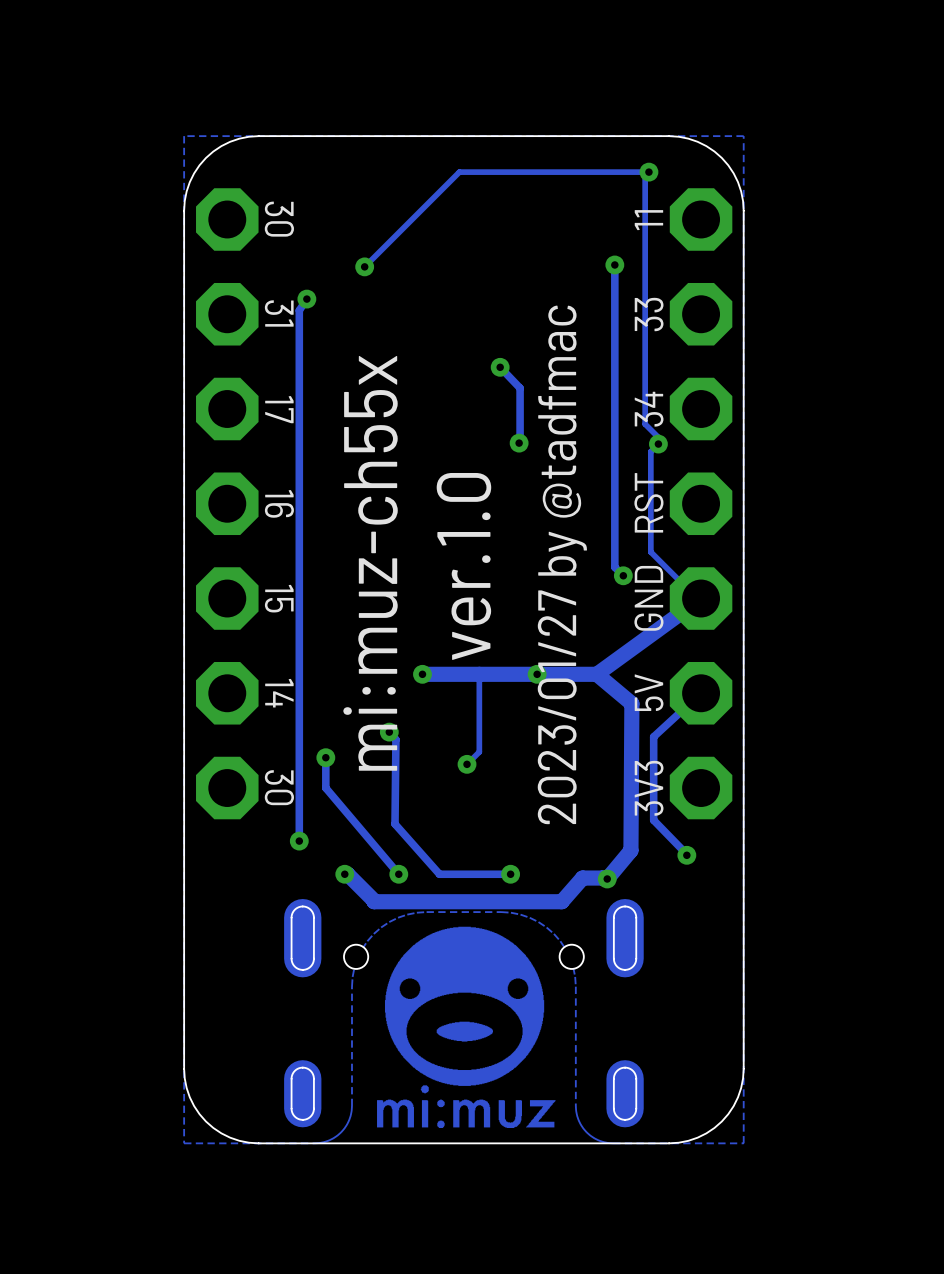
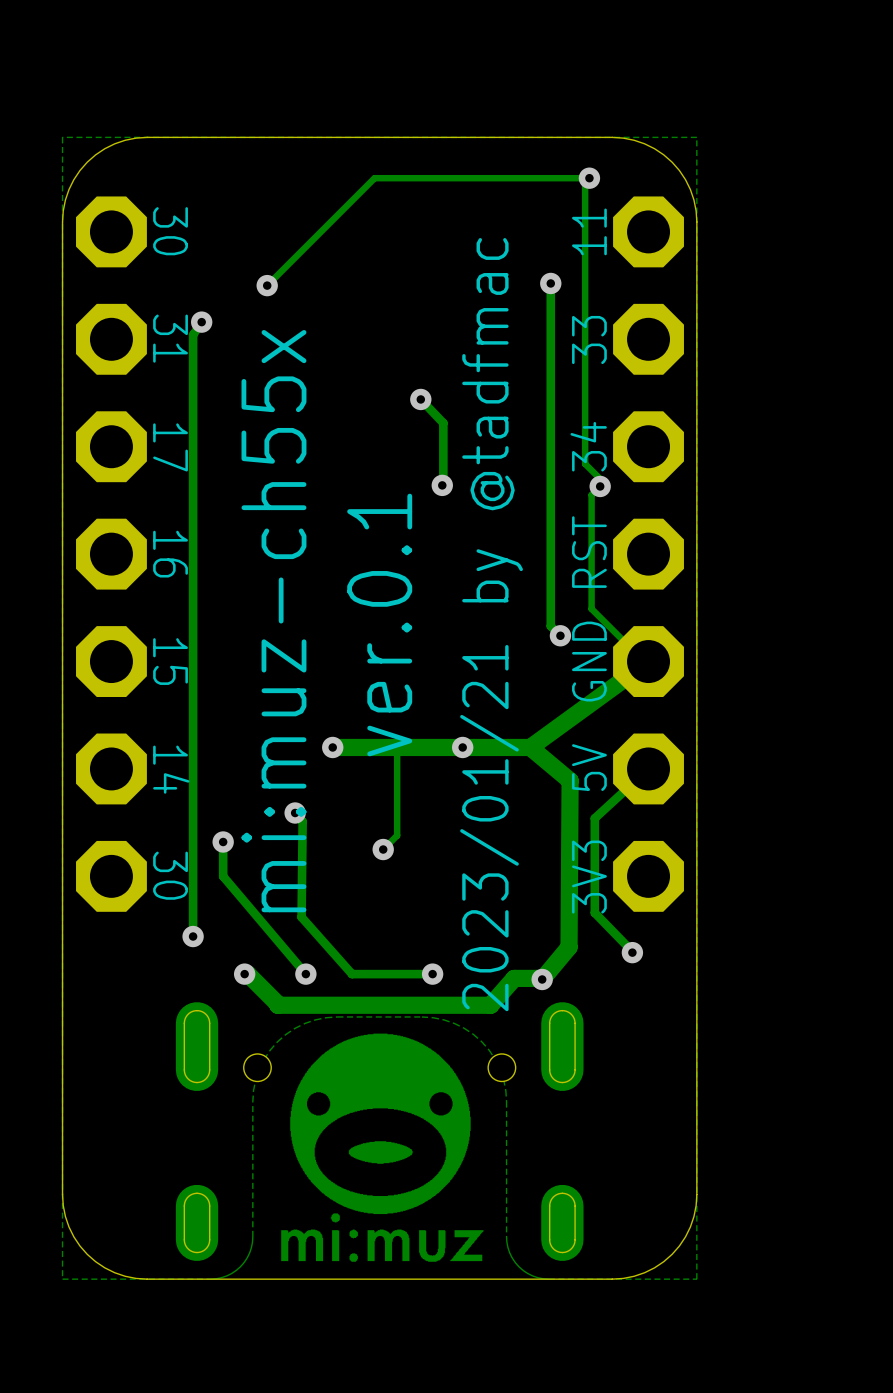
text: 2023/01/27 by @tadfmac (562, 564) -> 2023/01/21 by @tadfmac (491, 624)
text: ver.1.0 (463, 566) -> ver.0.1 (379, 624)

